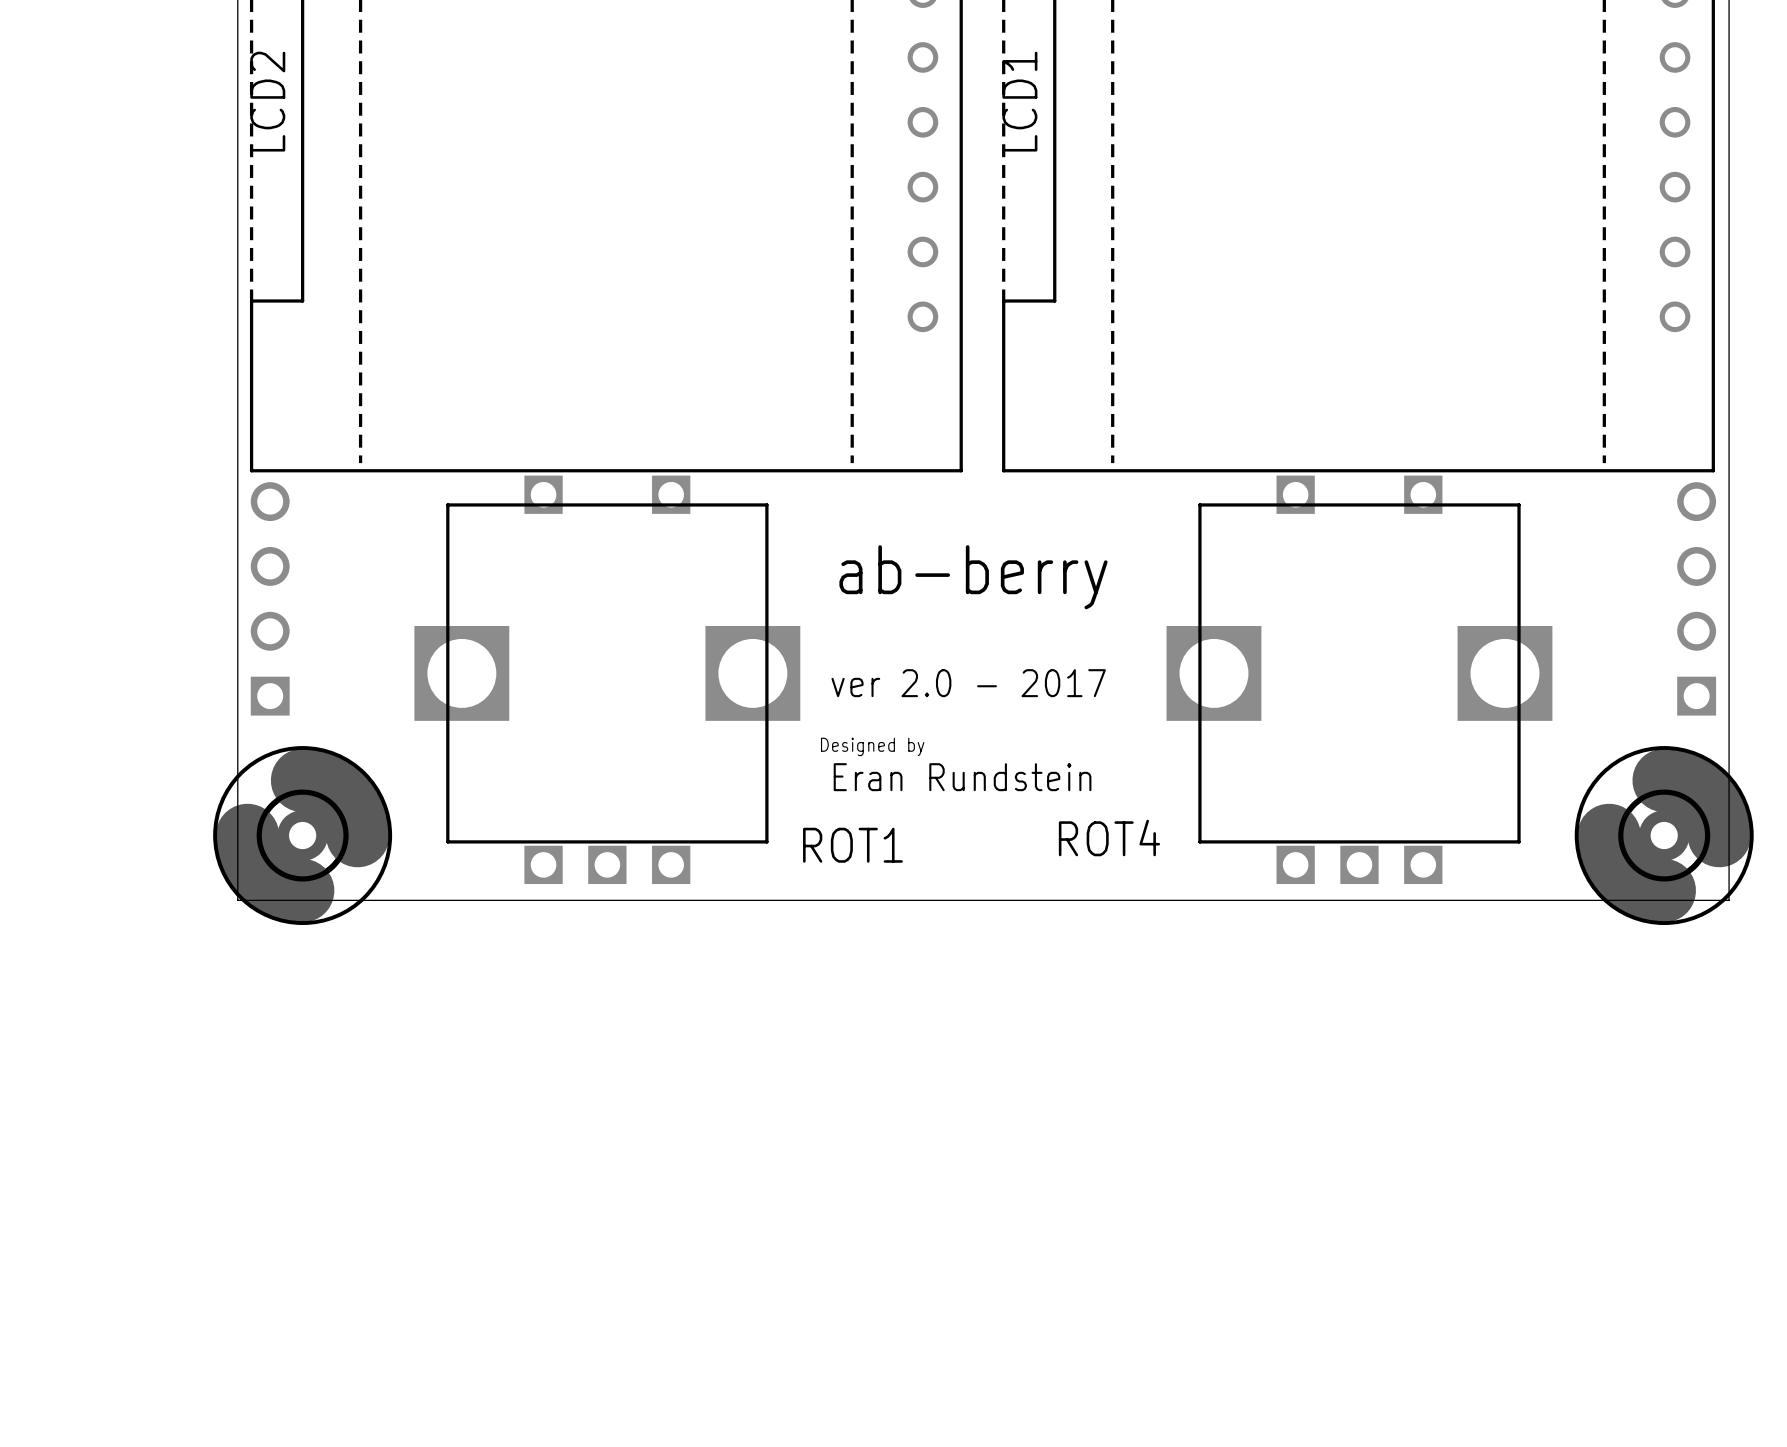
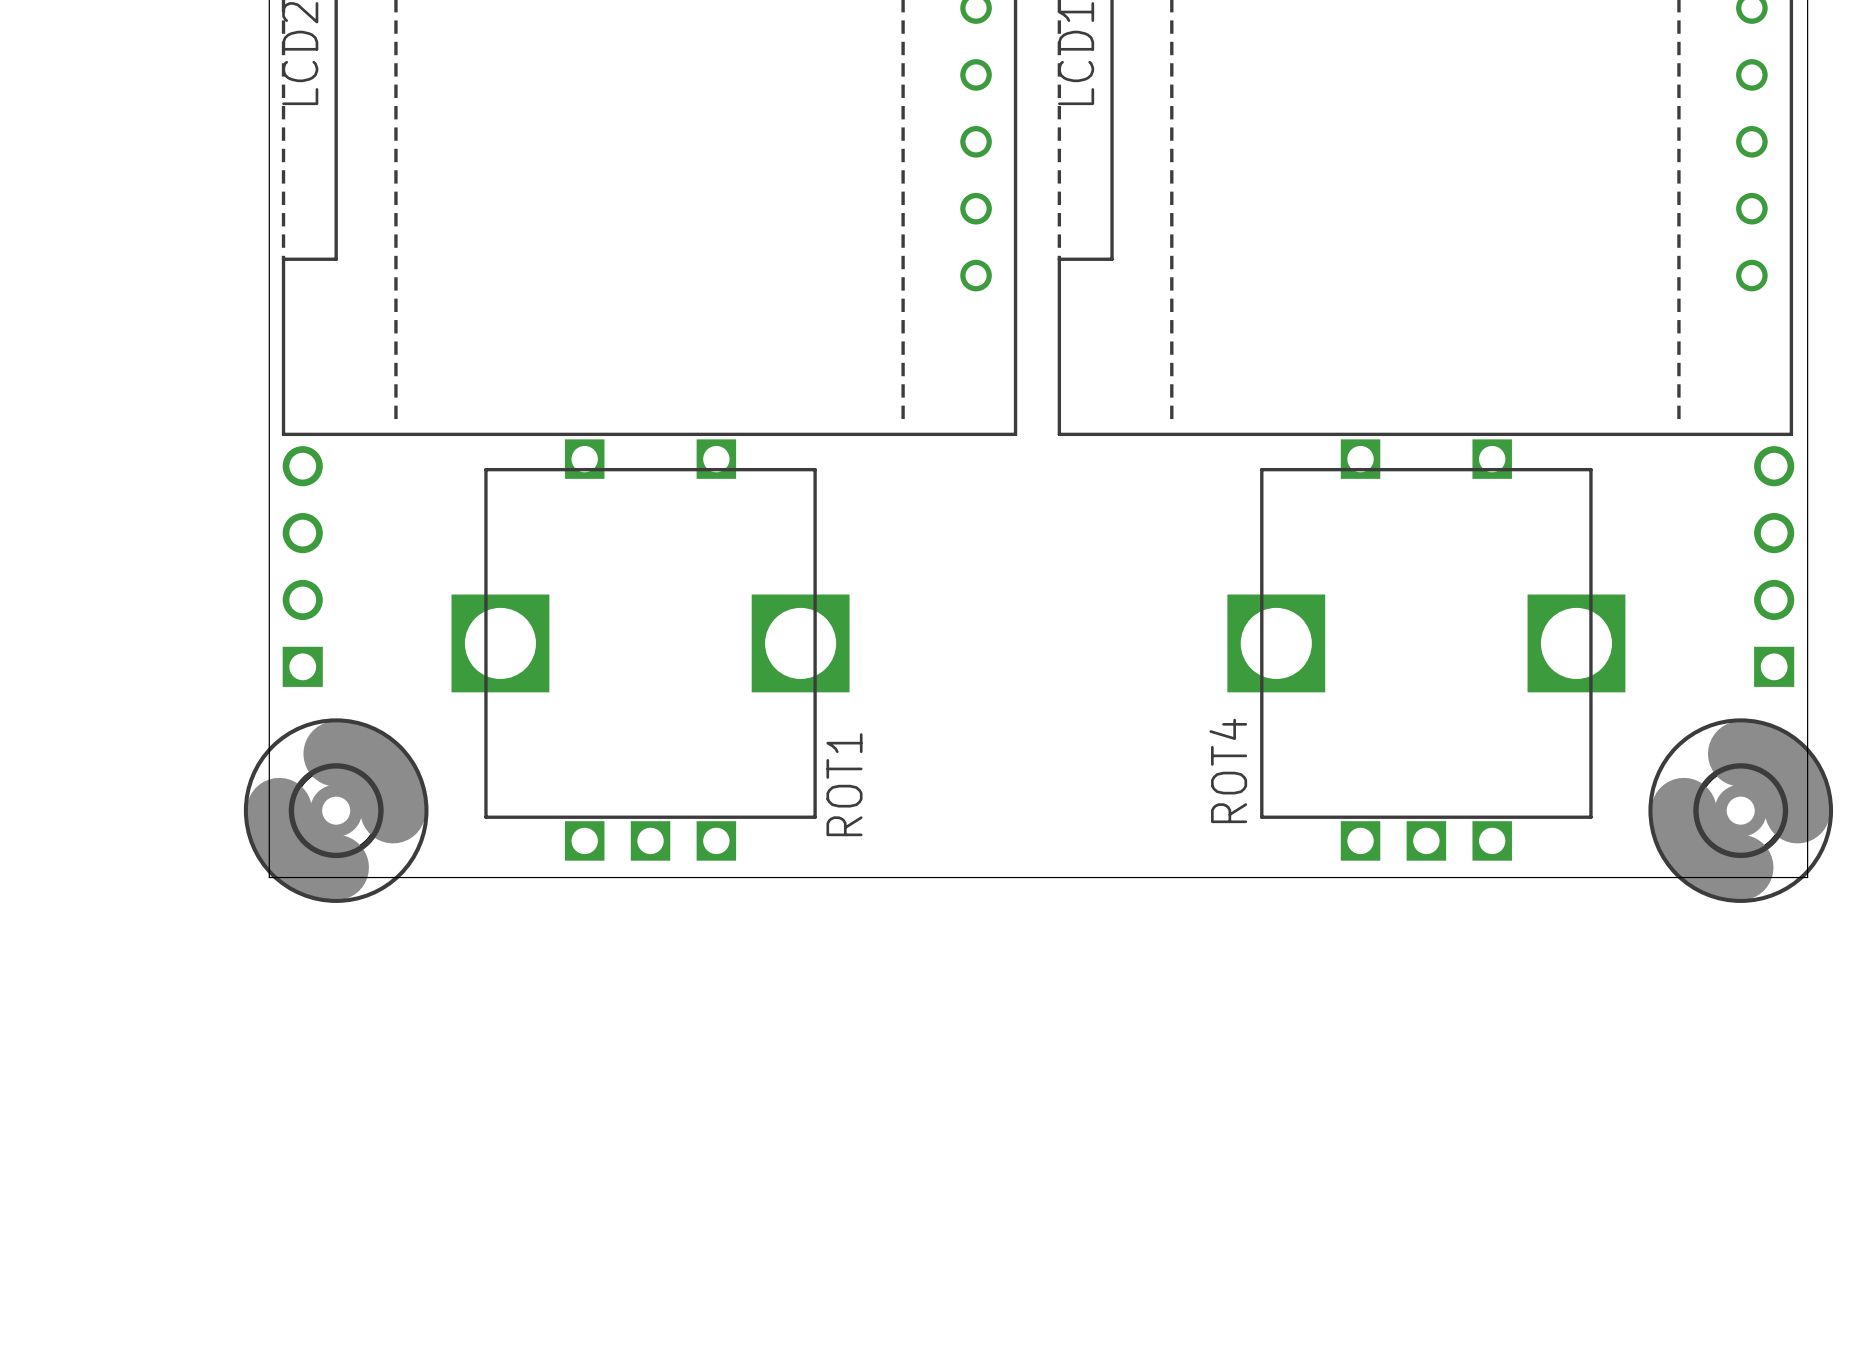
text: ab-berry (973, 577) -> none
text: ver 2.0 - 2017 (968, 683) -> none
text: Designed by (872, 746) -> none
text: Eran Rundstein (962, 777) -> none
ROT4 name rotation: 0° (1109, 838) -> 90° counterclockwise (1228, 770)
ROT1 name rotation: 0° (852, 845) -> 90° counterclockwise (844, 784)

